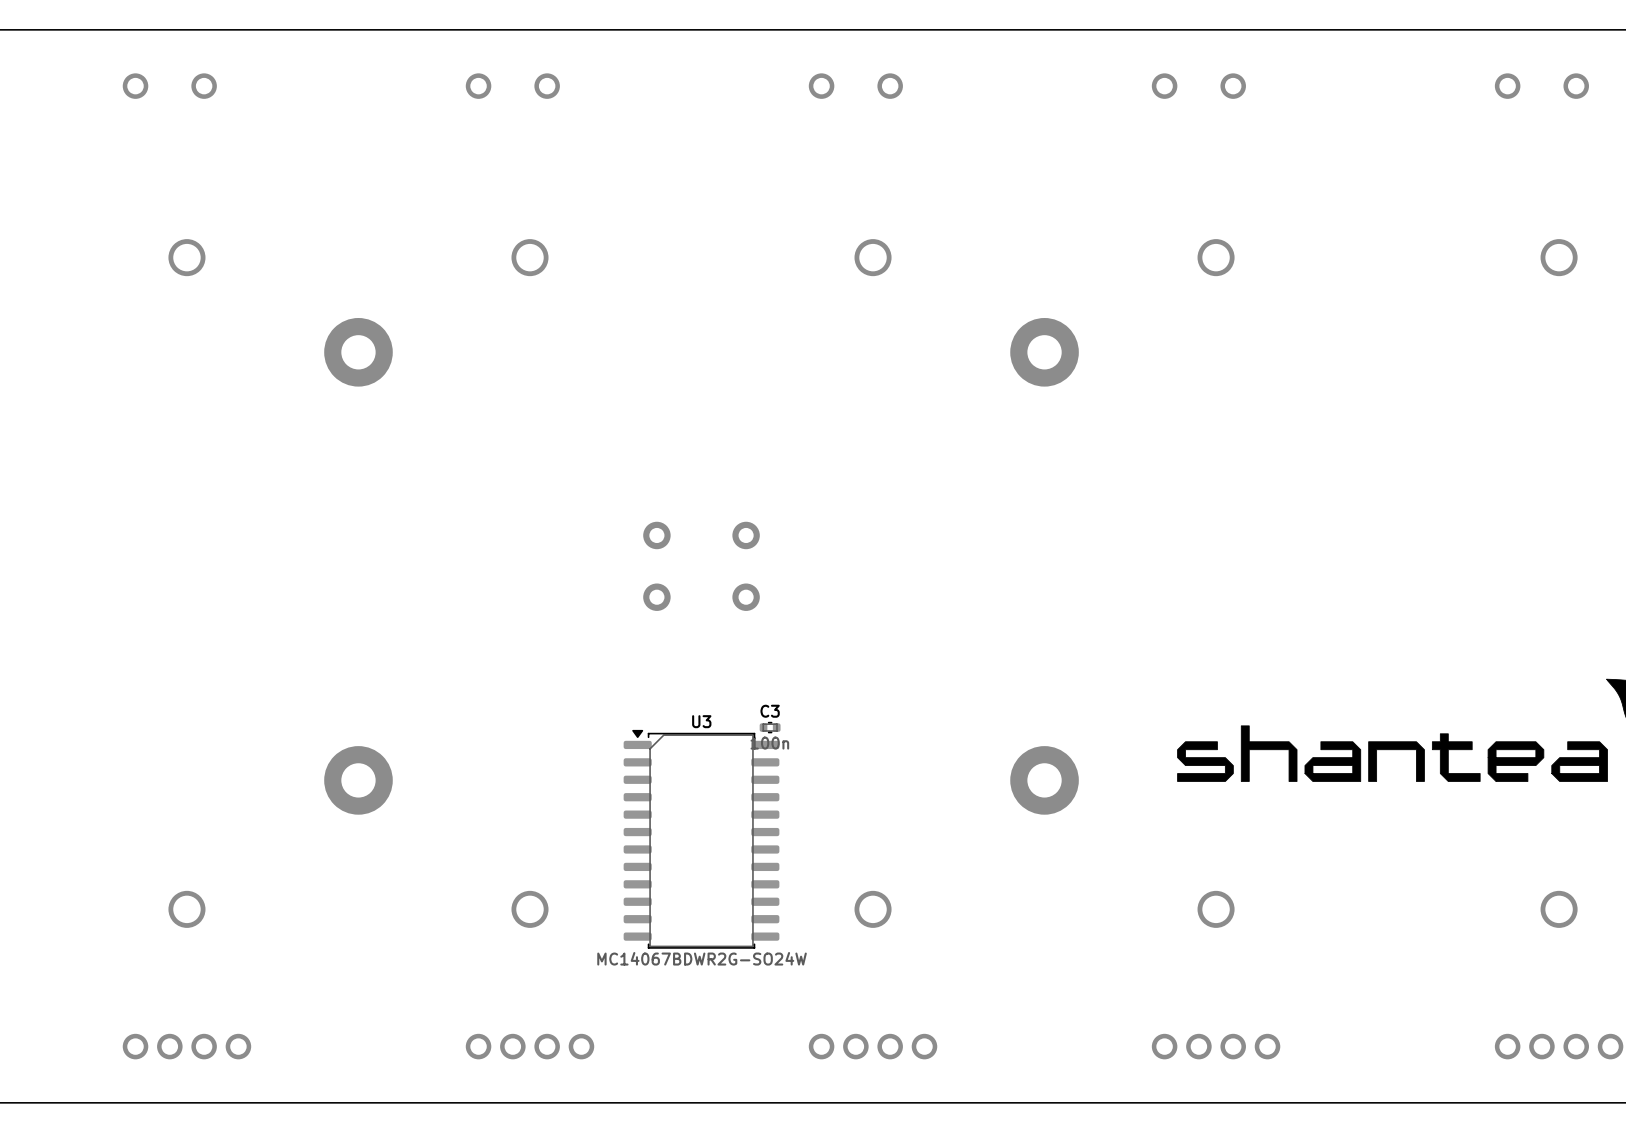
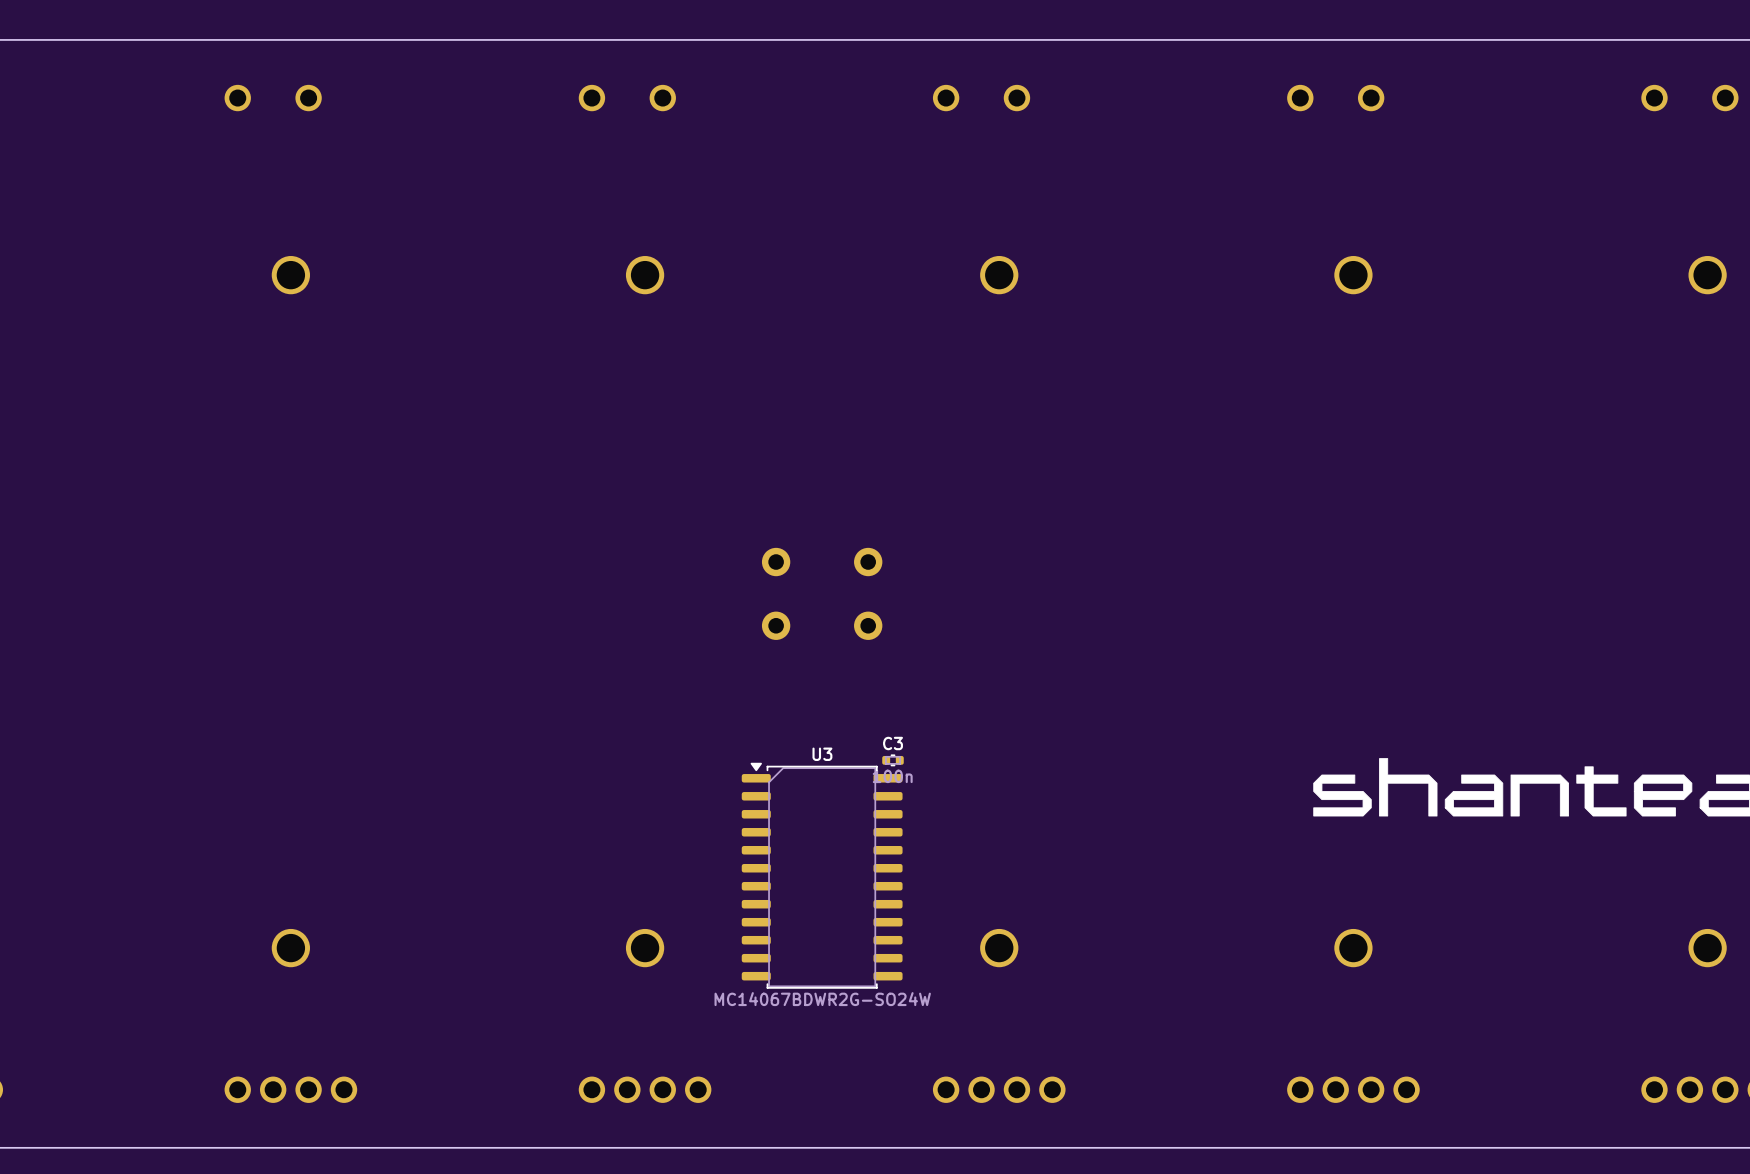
part: (358, 352) -> none
part: (1044, 352) -> none
part: (358, 780) -> none
part: (1044, 780) -> none

